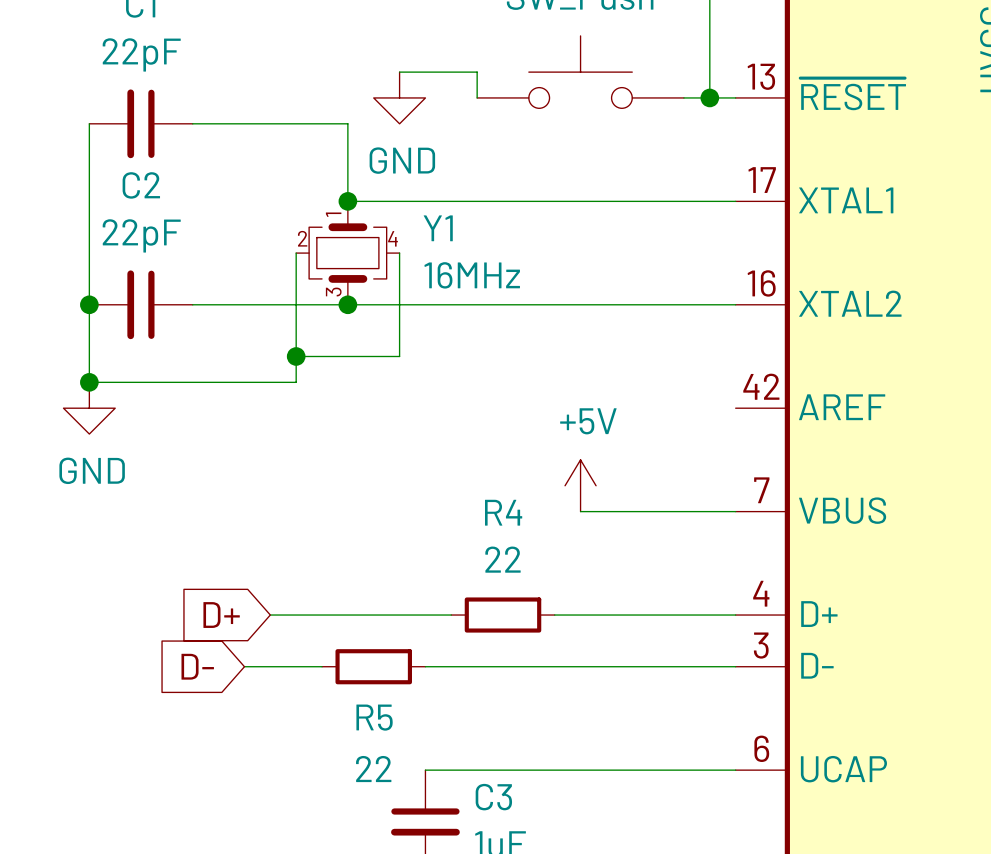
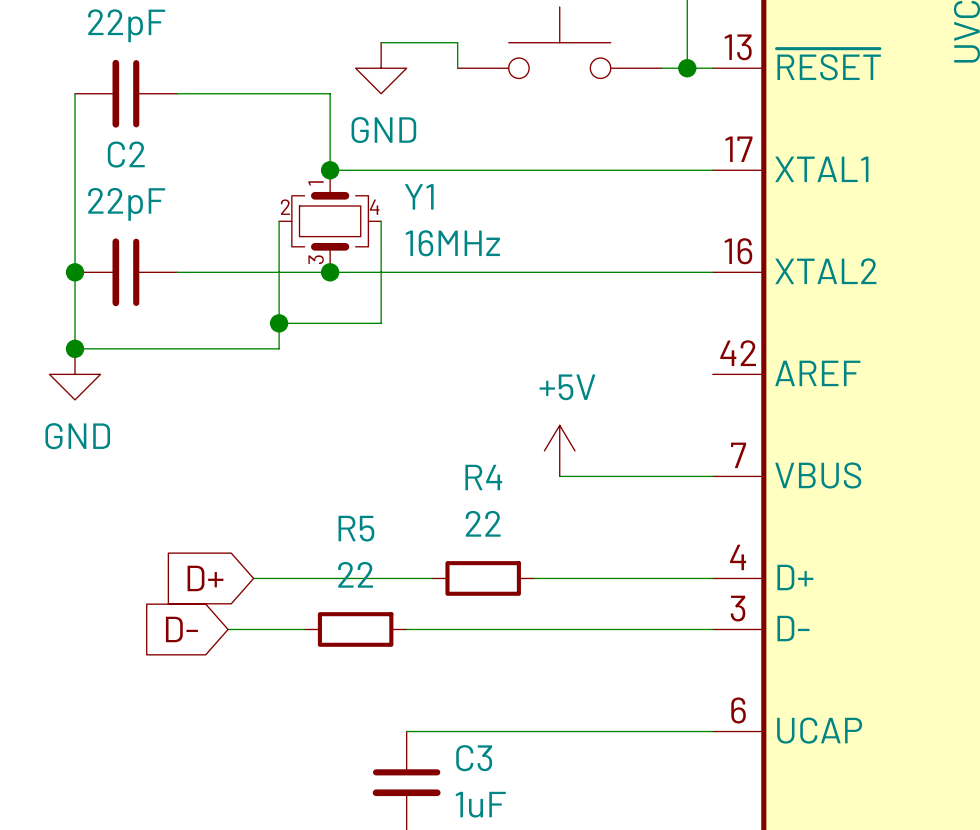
R5 name position: R5 (374, 717) -> R5 (356, 528)
R5 value position: 22 (373, 769) -> 22 (355, 574)

